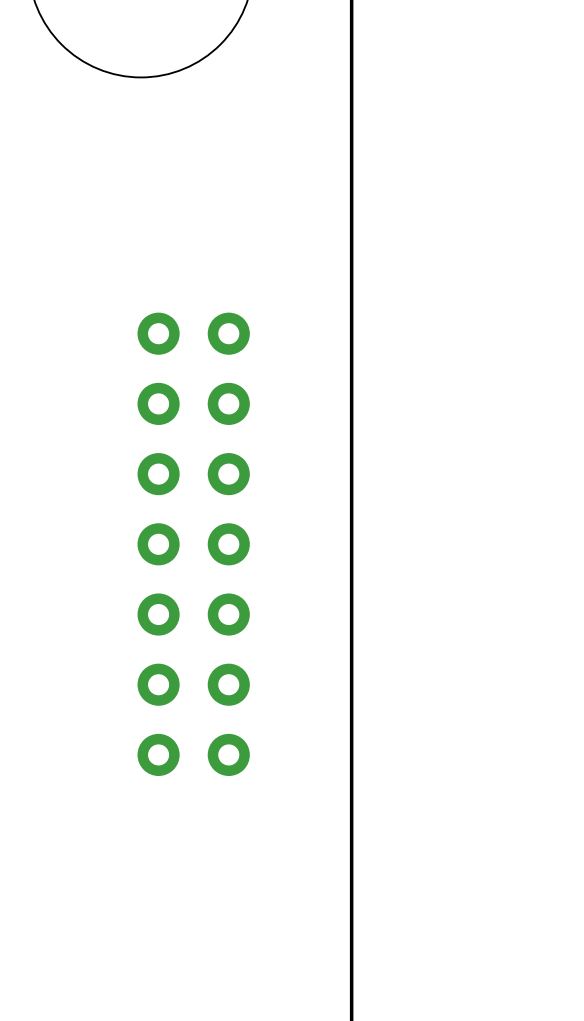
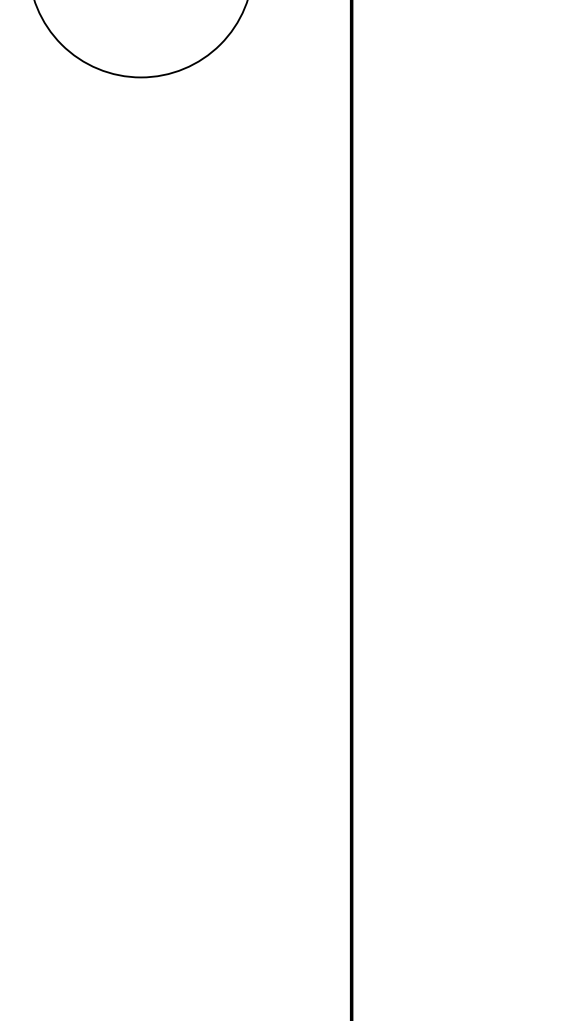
via: (158, 333) -> none
via: (228, 333) -> none
via: (158, 403) -> none
via: (228, 403) -> none
via: (158, 474) -> none
via: (228, 474) -> none
via: (158, 544) -> none
via: (228, 544) -> none
via: (158, 614) -> none
via: (228, 614) -> none
via: (158, 684) -> none
via: (228, 684) -> none
via: (158, 754) -> none
via: (228, 754) -> none

